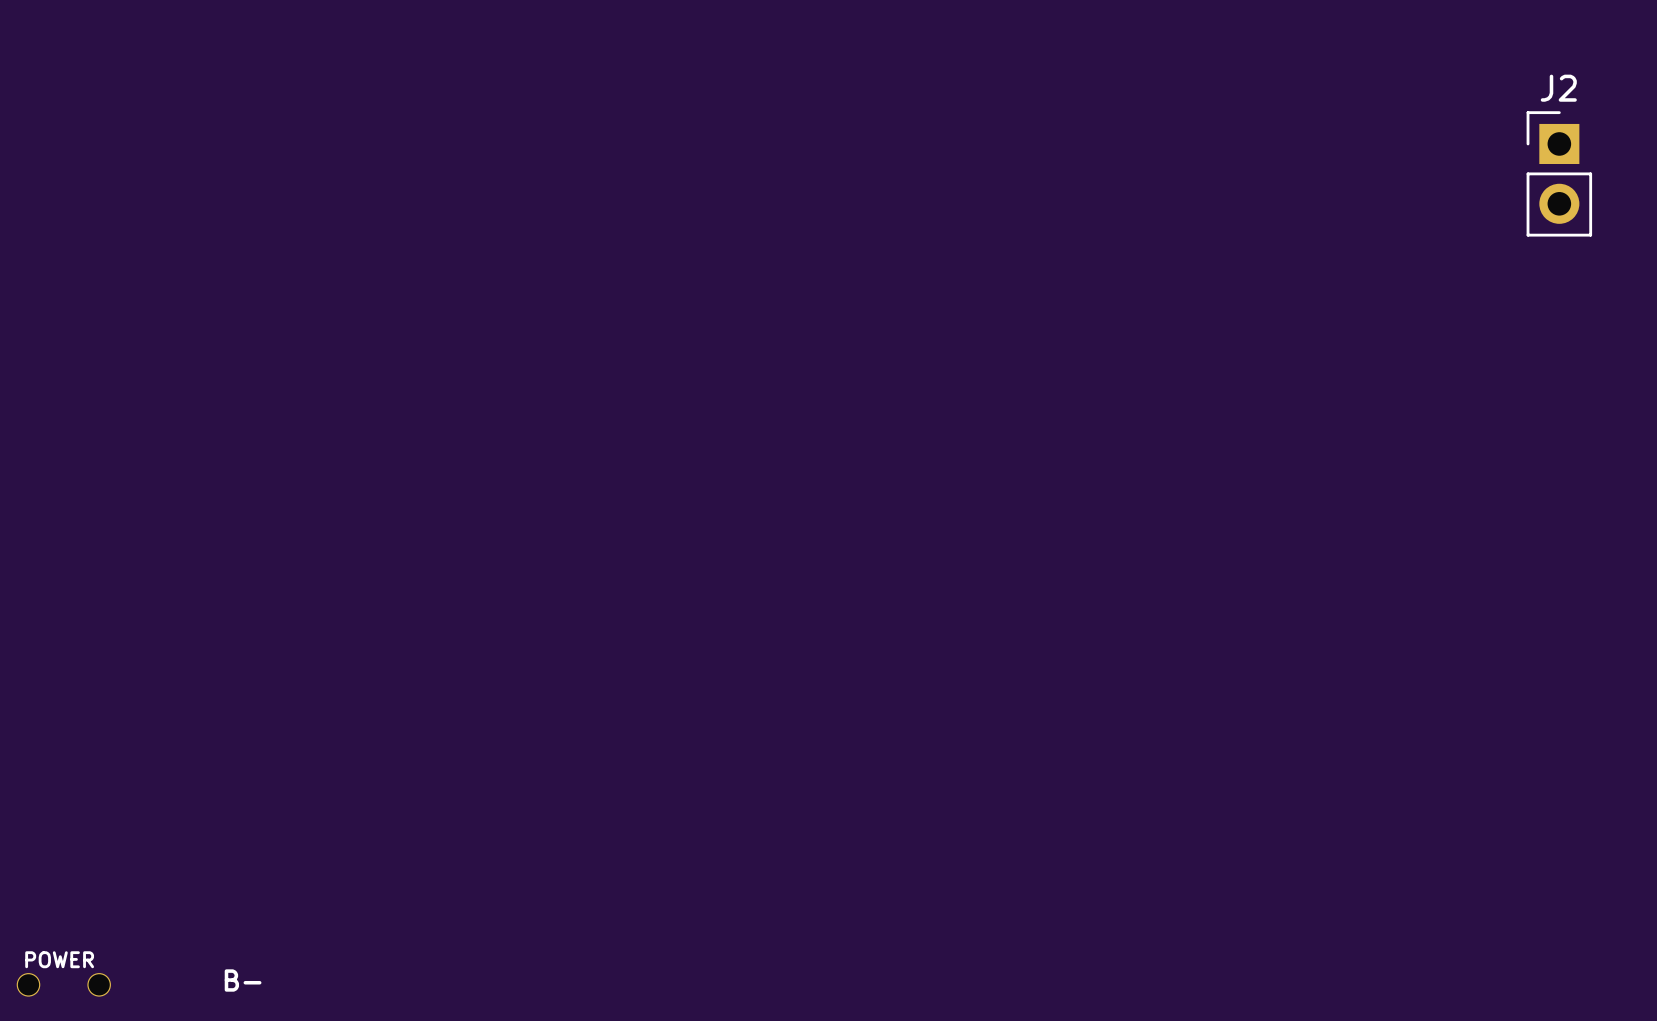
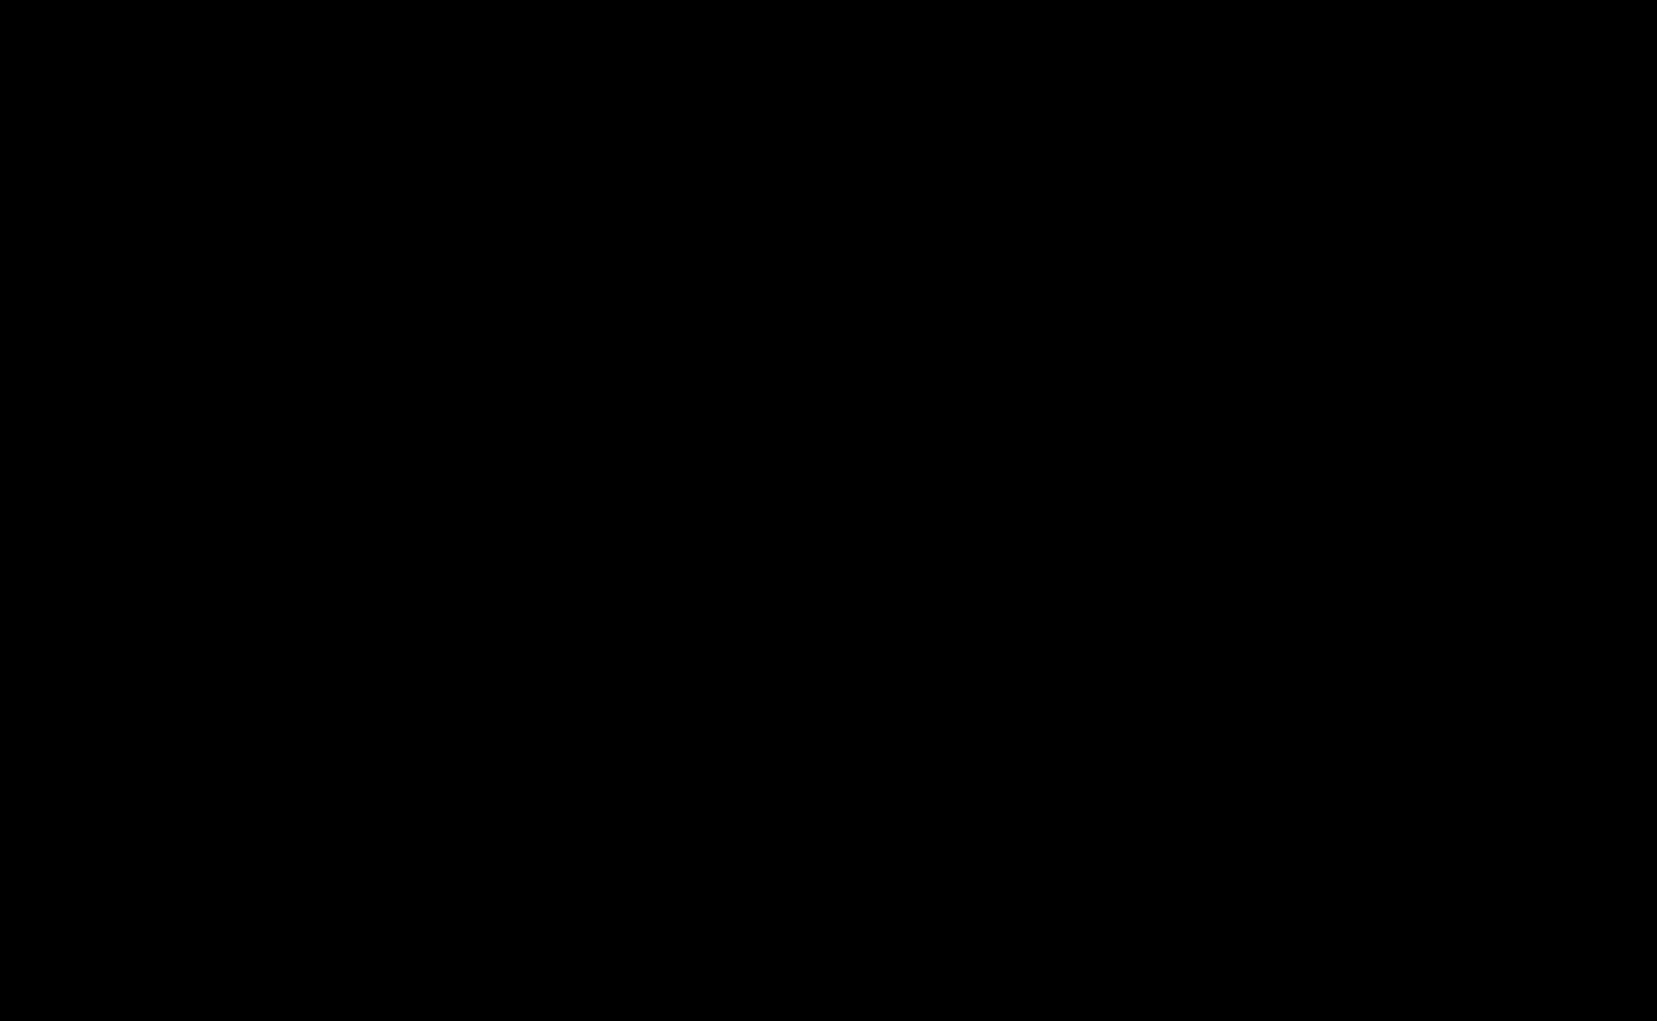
J2: (1559, 173) -> none
text: POWER (59, 959) -> none
text: B- (243, 980) -> none
part: (63, 984) -> none

